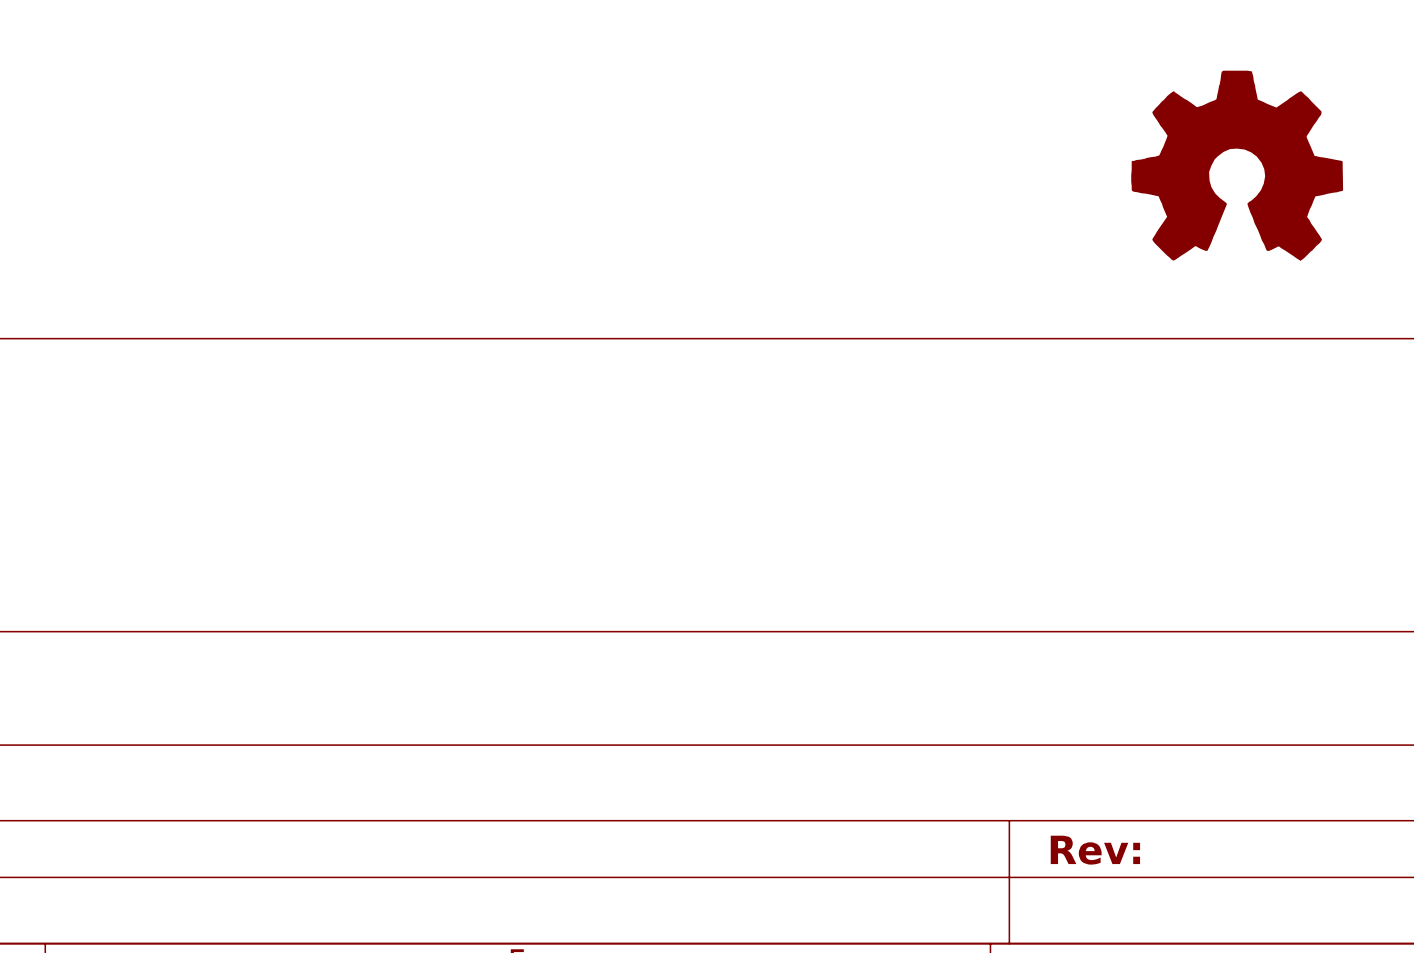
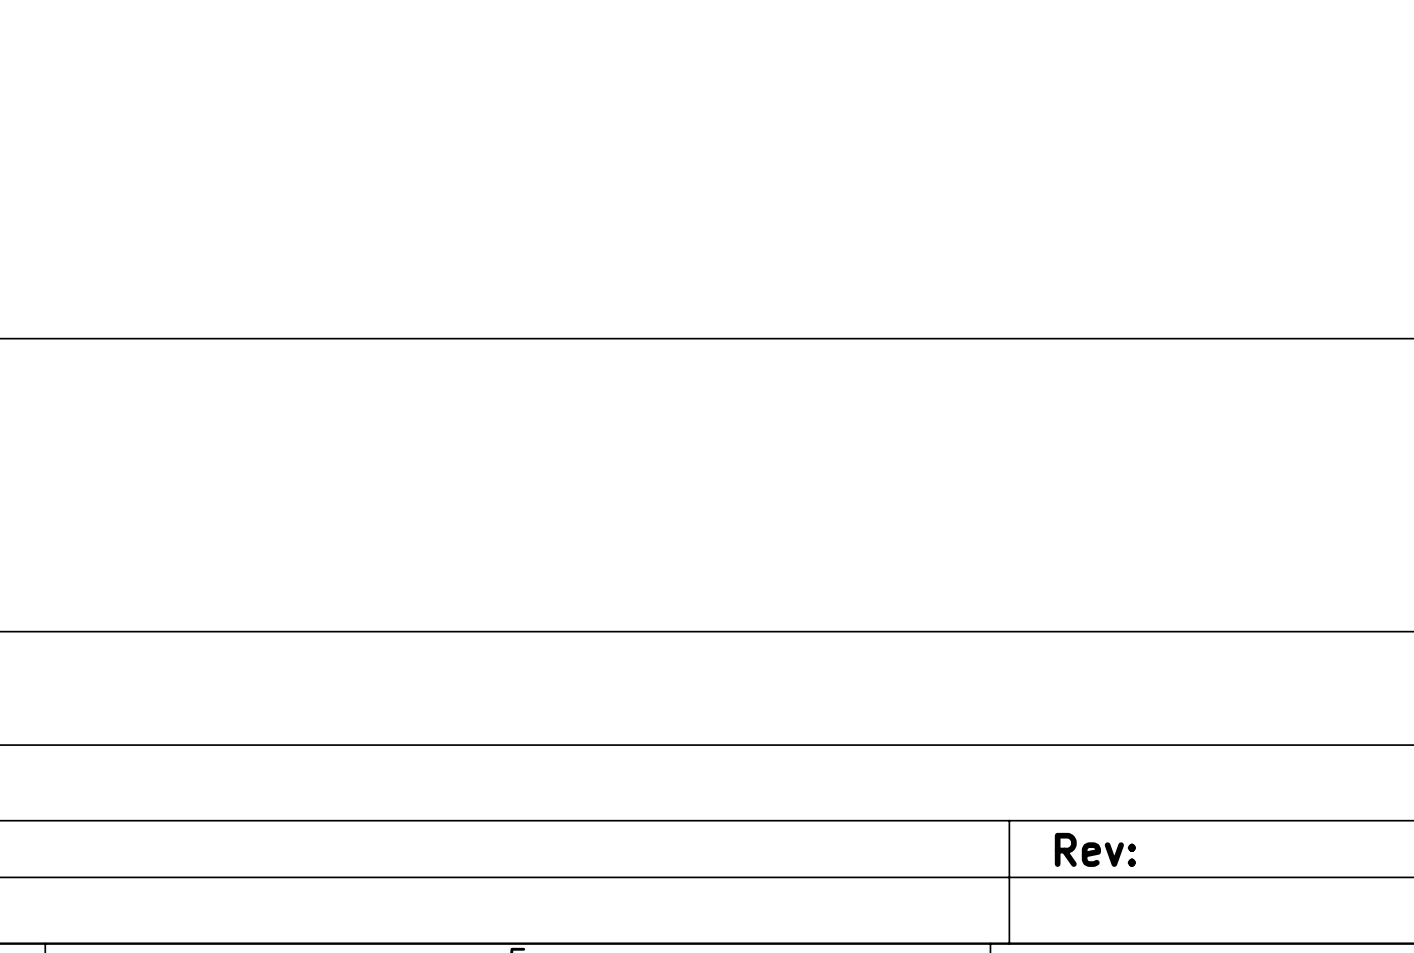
part: (1237, 165) -> none

